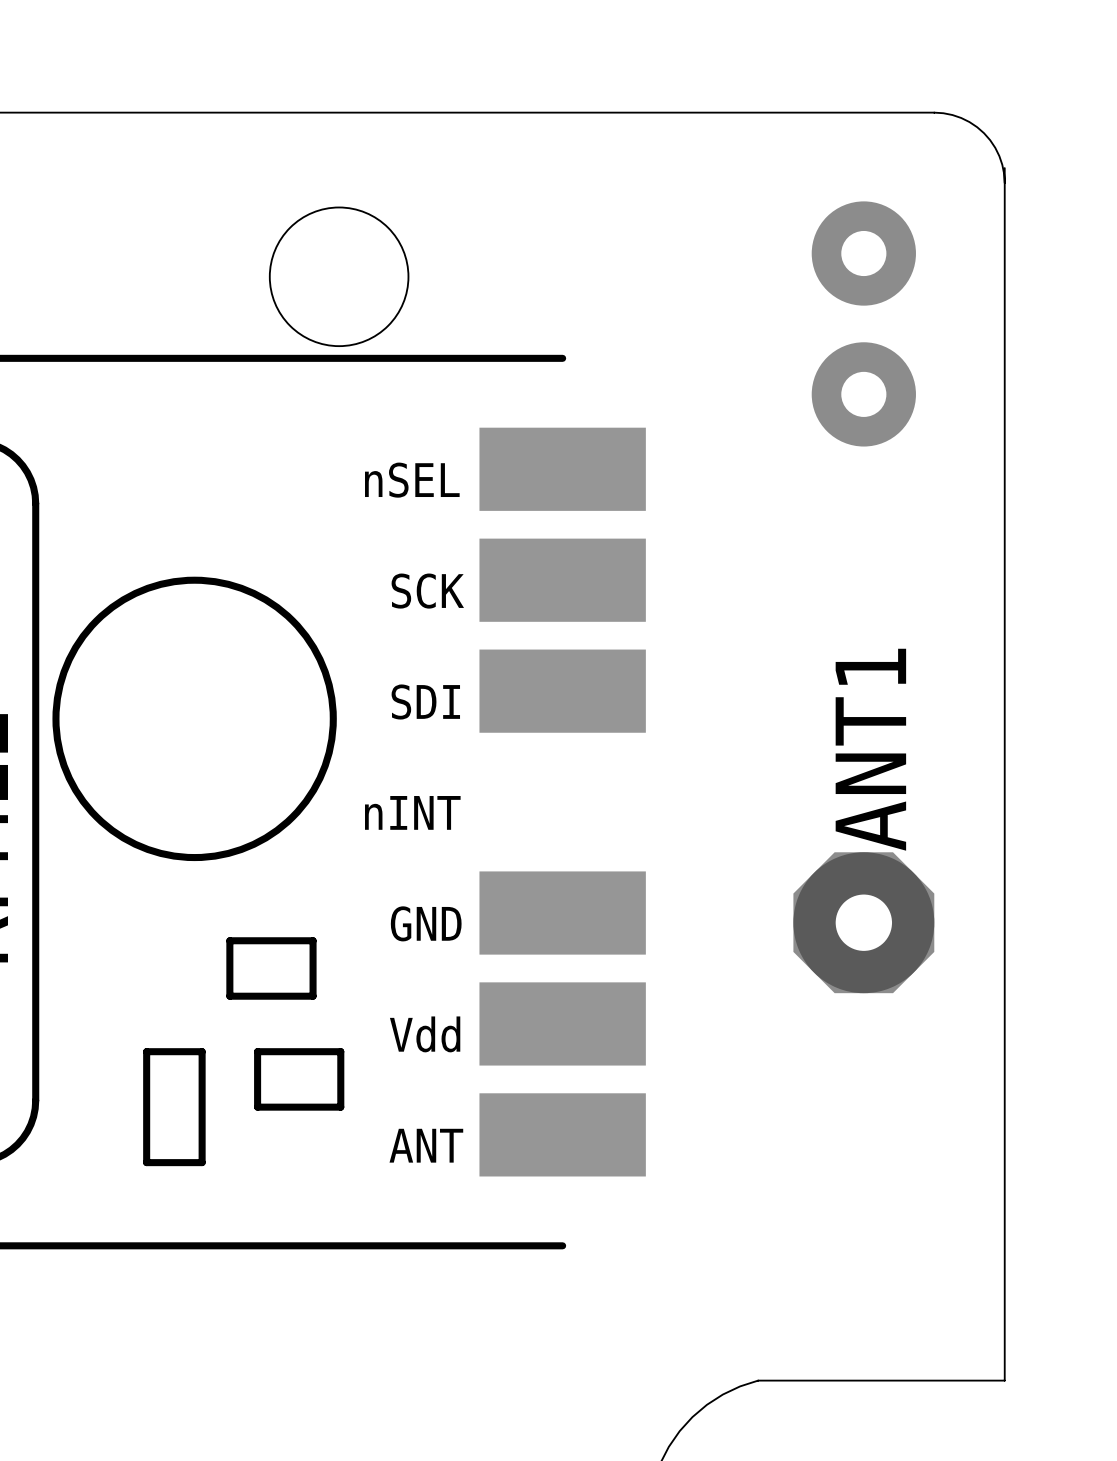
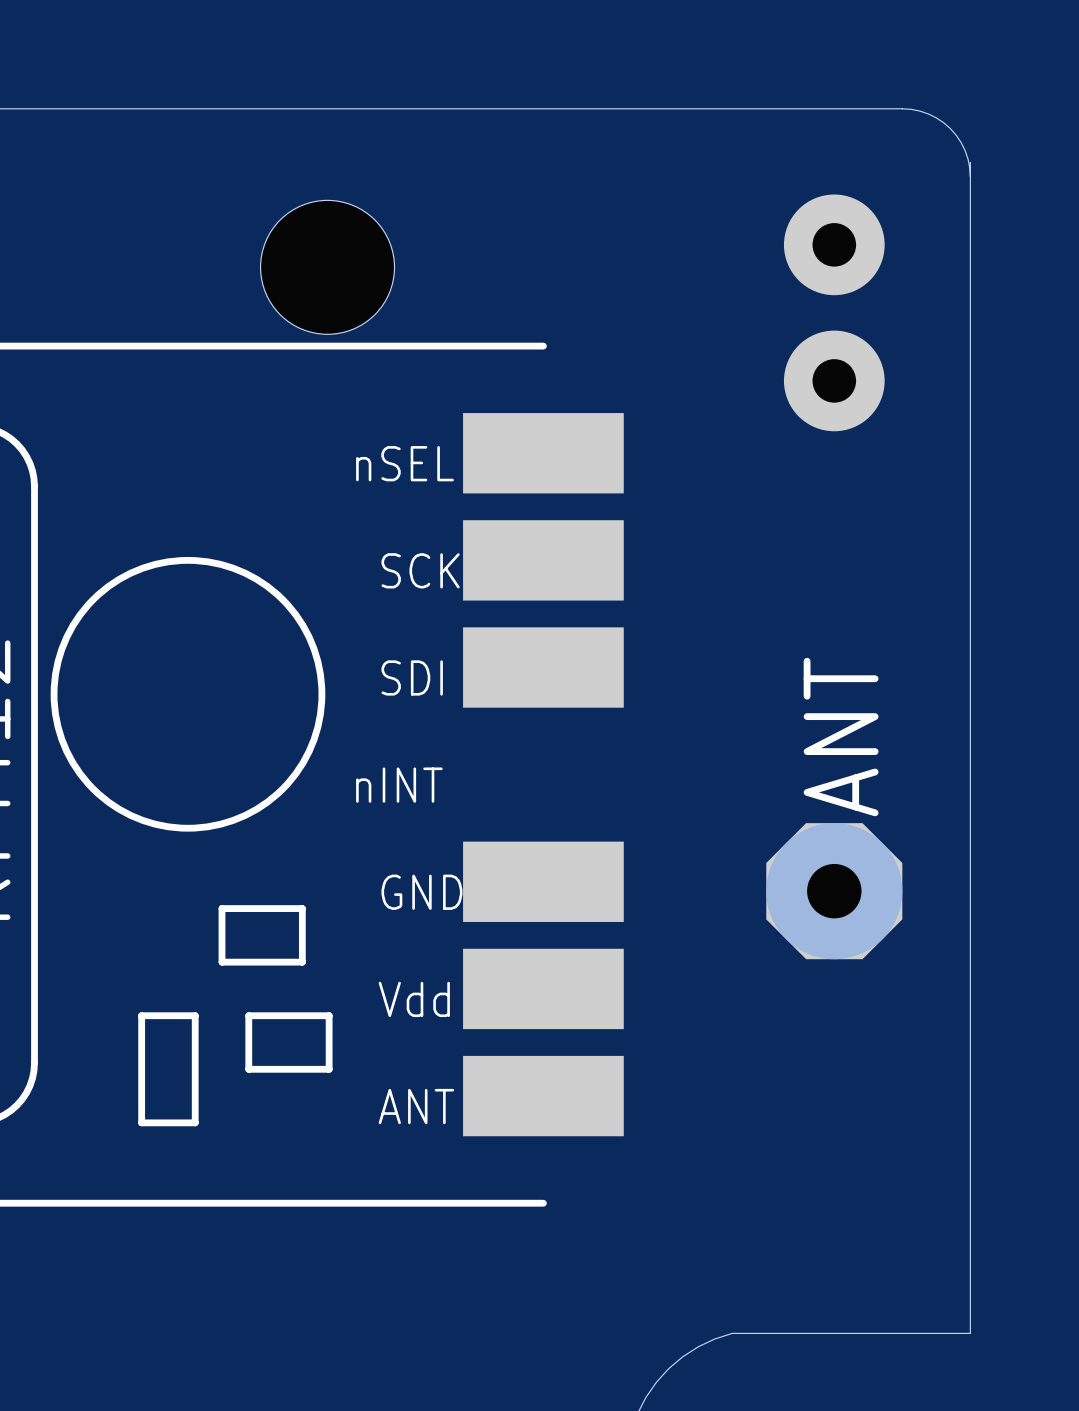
ANT1 name: ANT1 (870, 749) -> ANT (841, 737)

